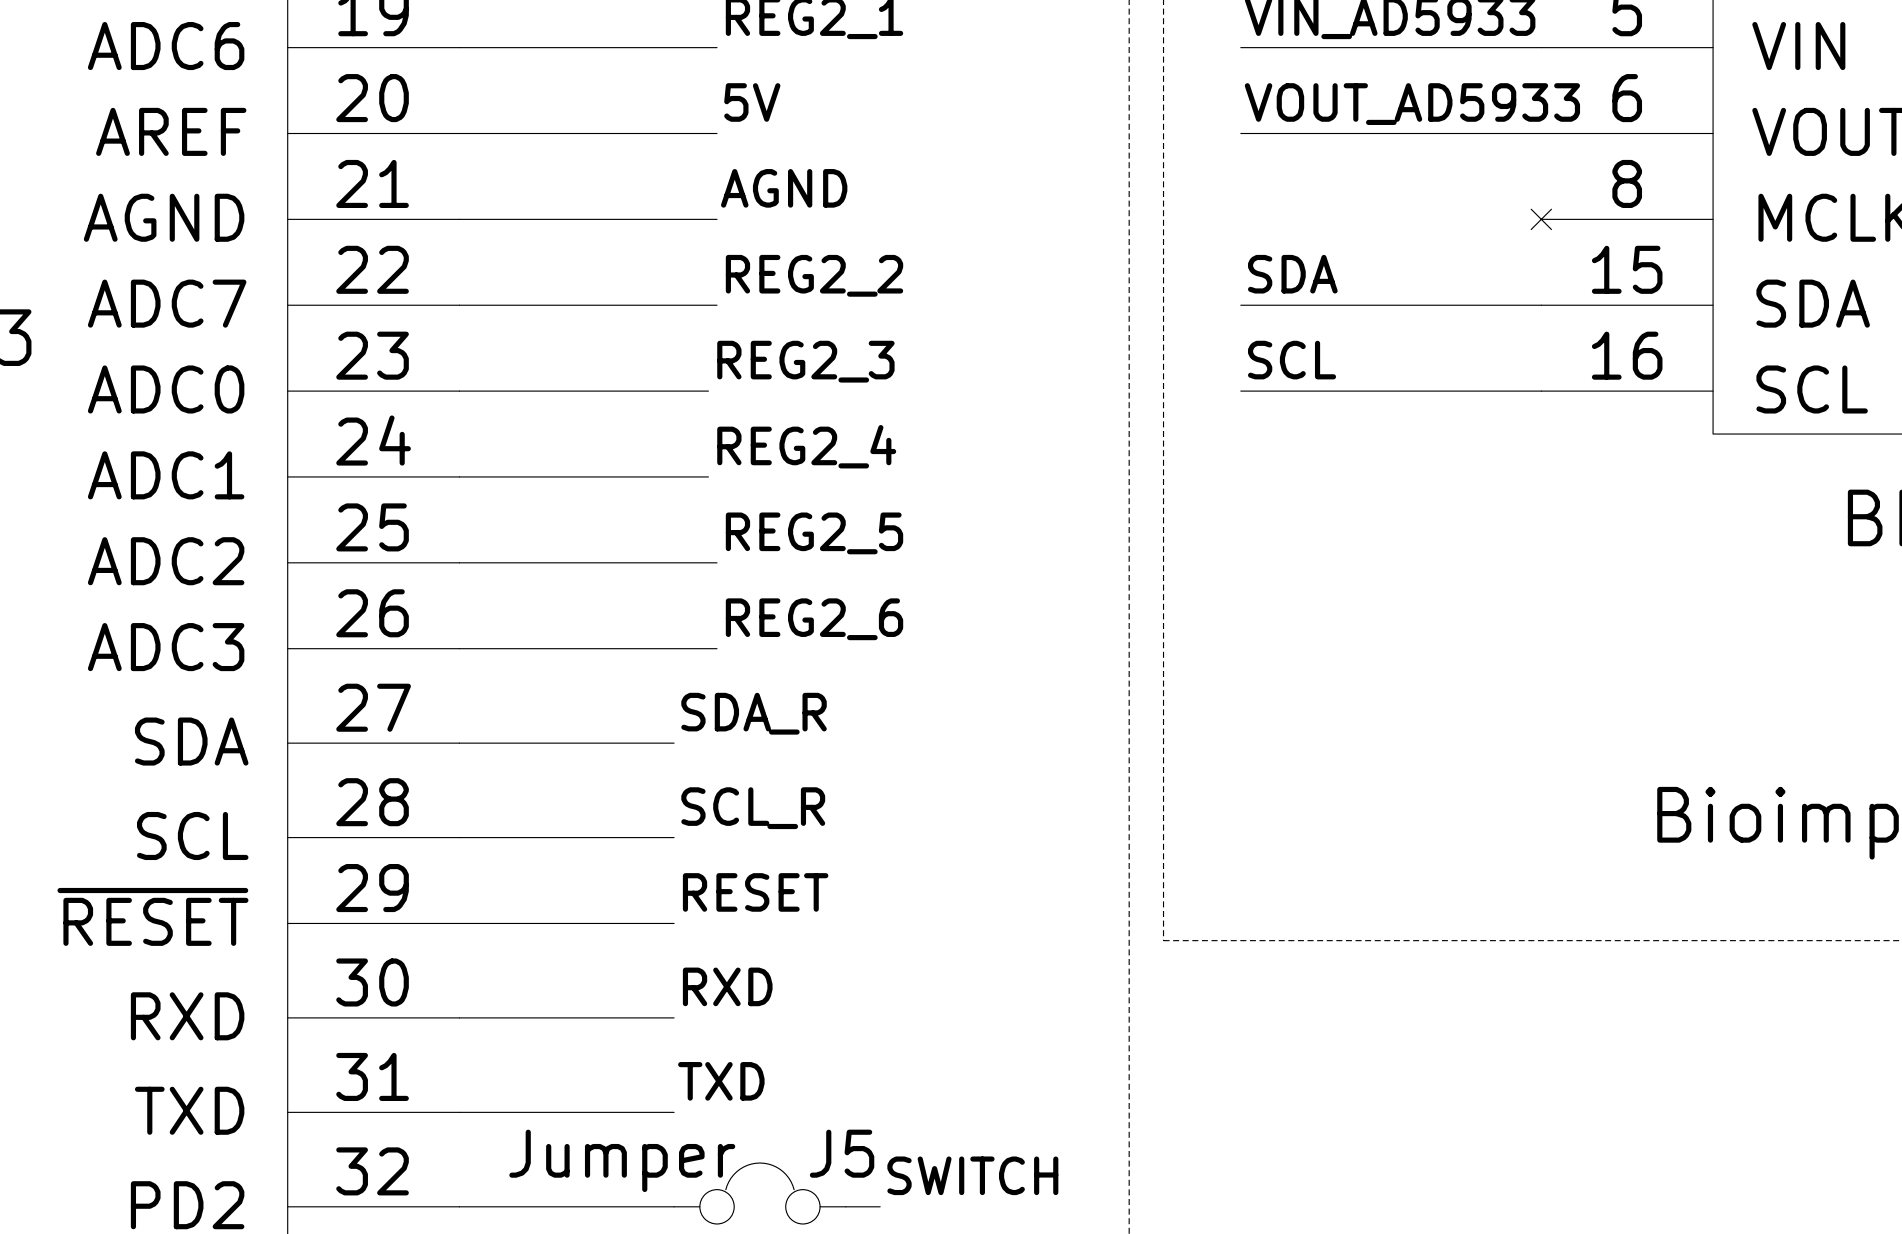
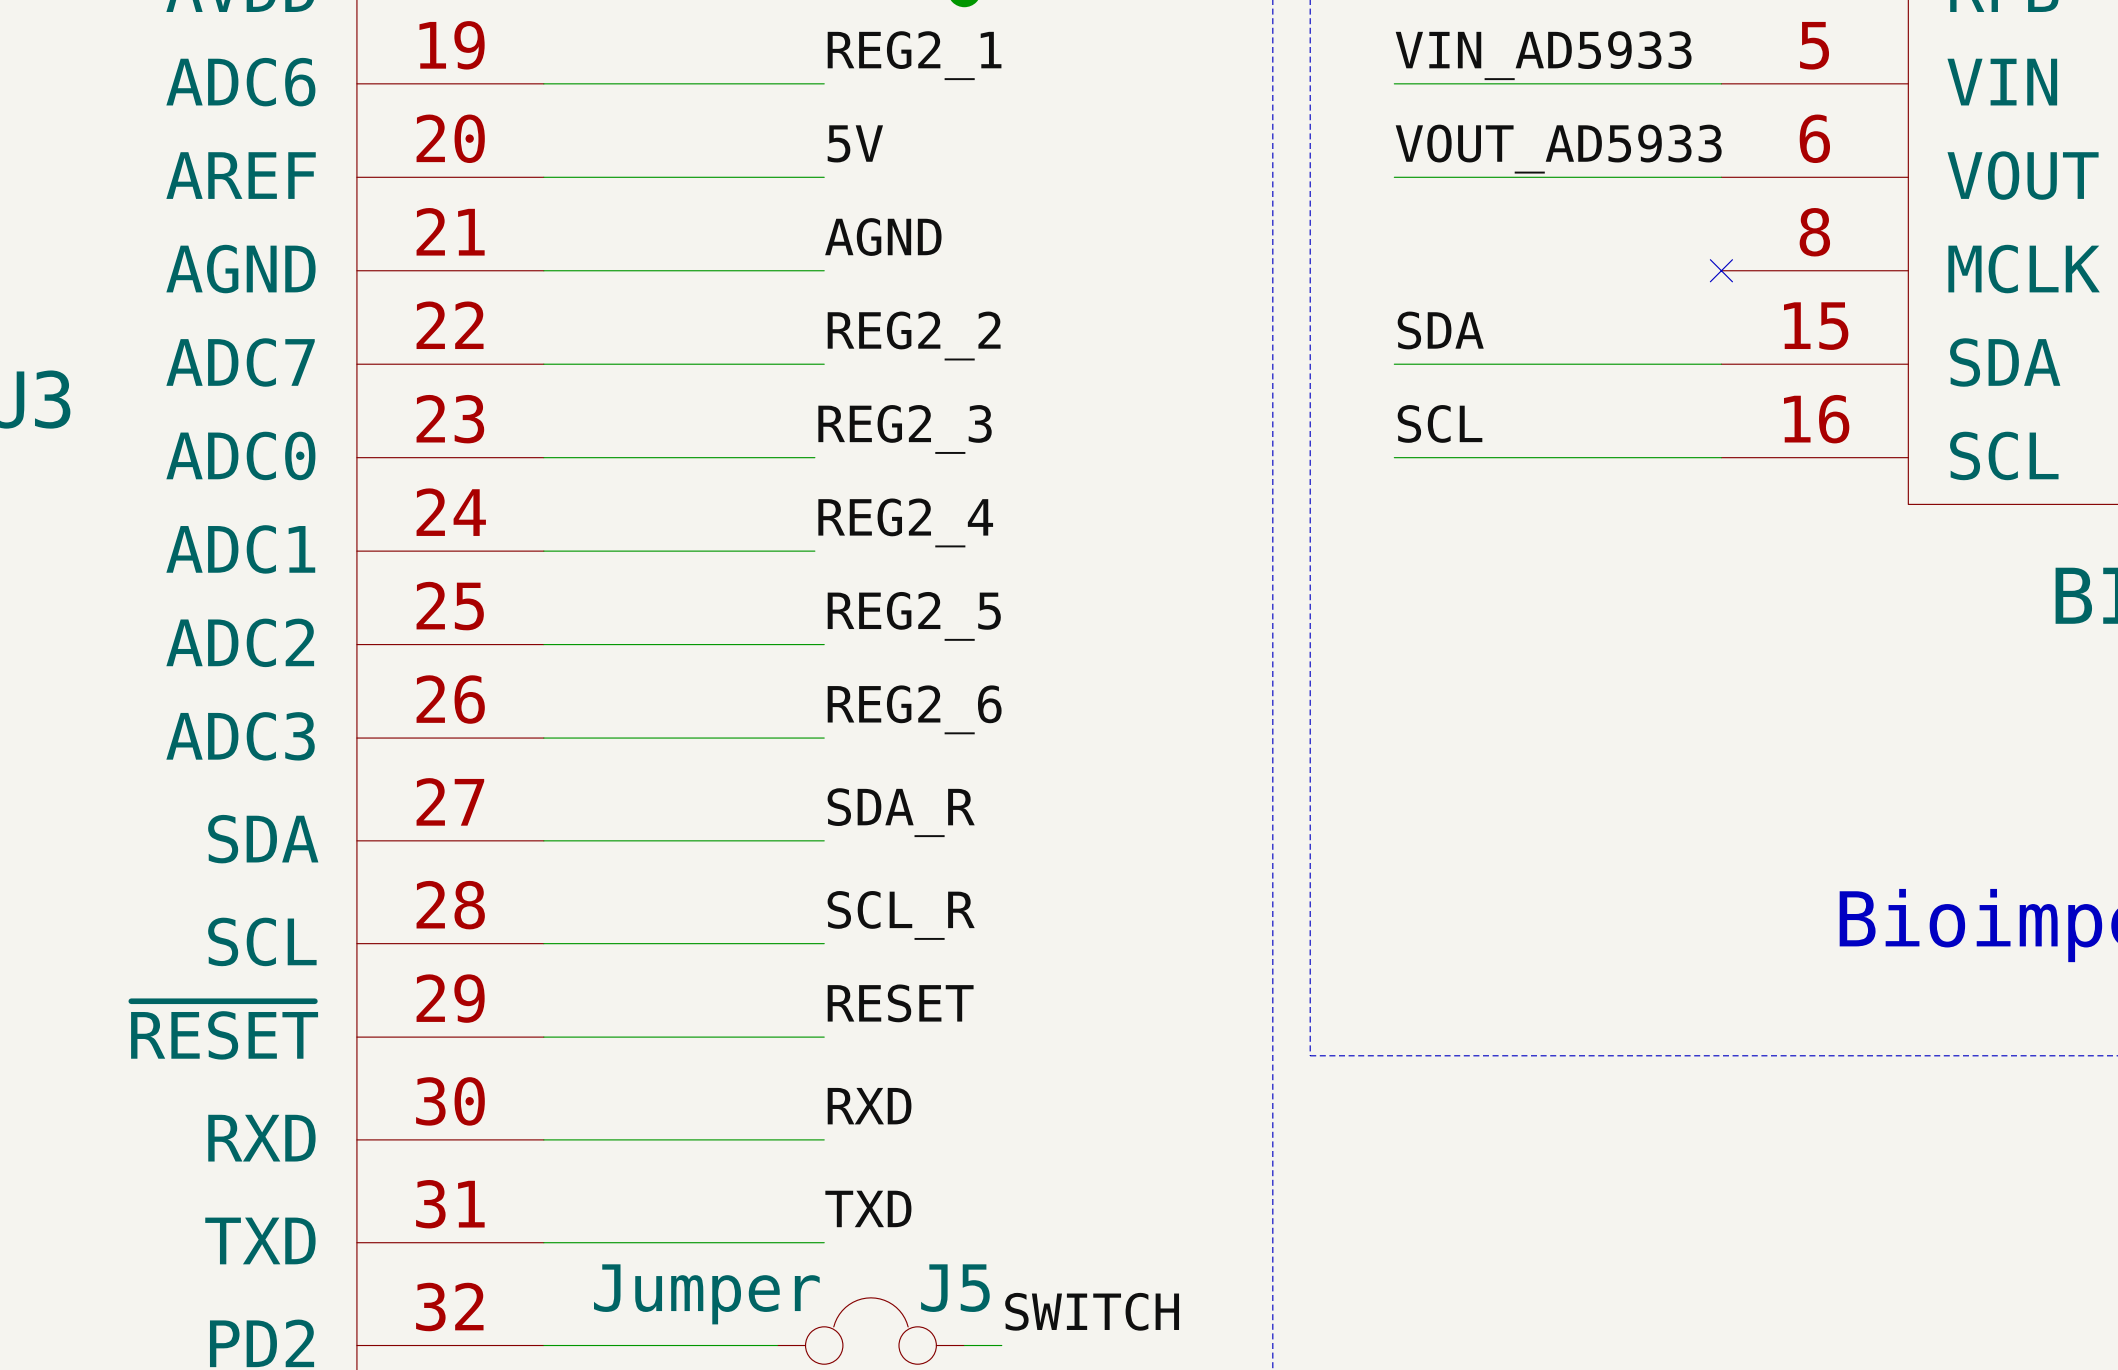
label position: SDA_R (754, 713) -> SDA_R (901, 812)
wire: none -> (777, 840) (824, 840)
label position: SCL_R (753, 808) -> SCL_R (901, 915)
wire: none -> (777, 943) (824, 943)
label position: RESET (755, 892) -> RESET (900, 1003)
wire: none -> (777, 1037) (824, 1037)
label position: RXD (727, 986) -> RXD (869, 1106)
wire: none -> (777, 1139) (824, 1139)
label position: TXD (721, 1081) -> TXD (868, 1208)
wire: none -> (777, 1242) (824, 1242)

